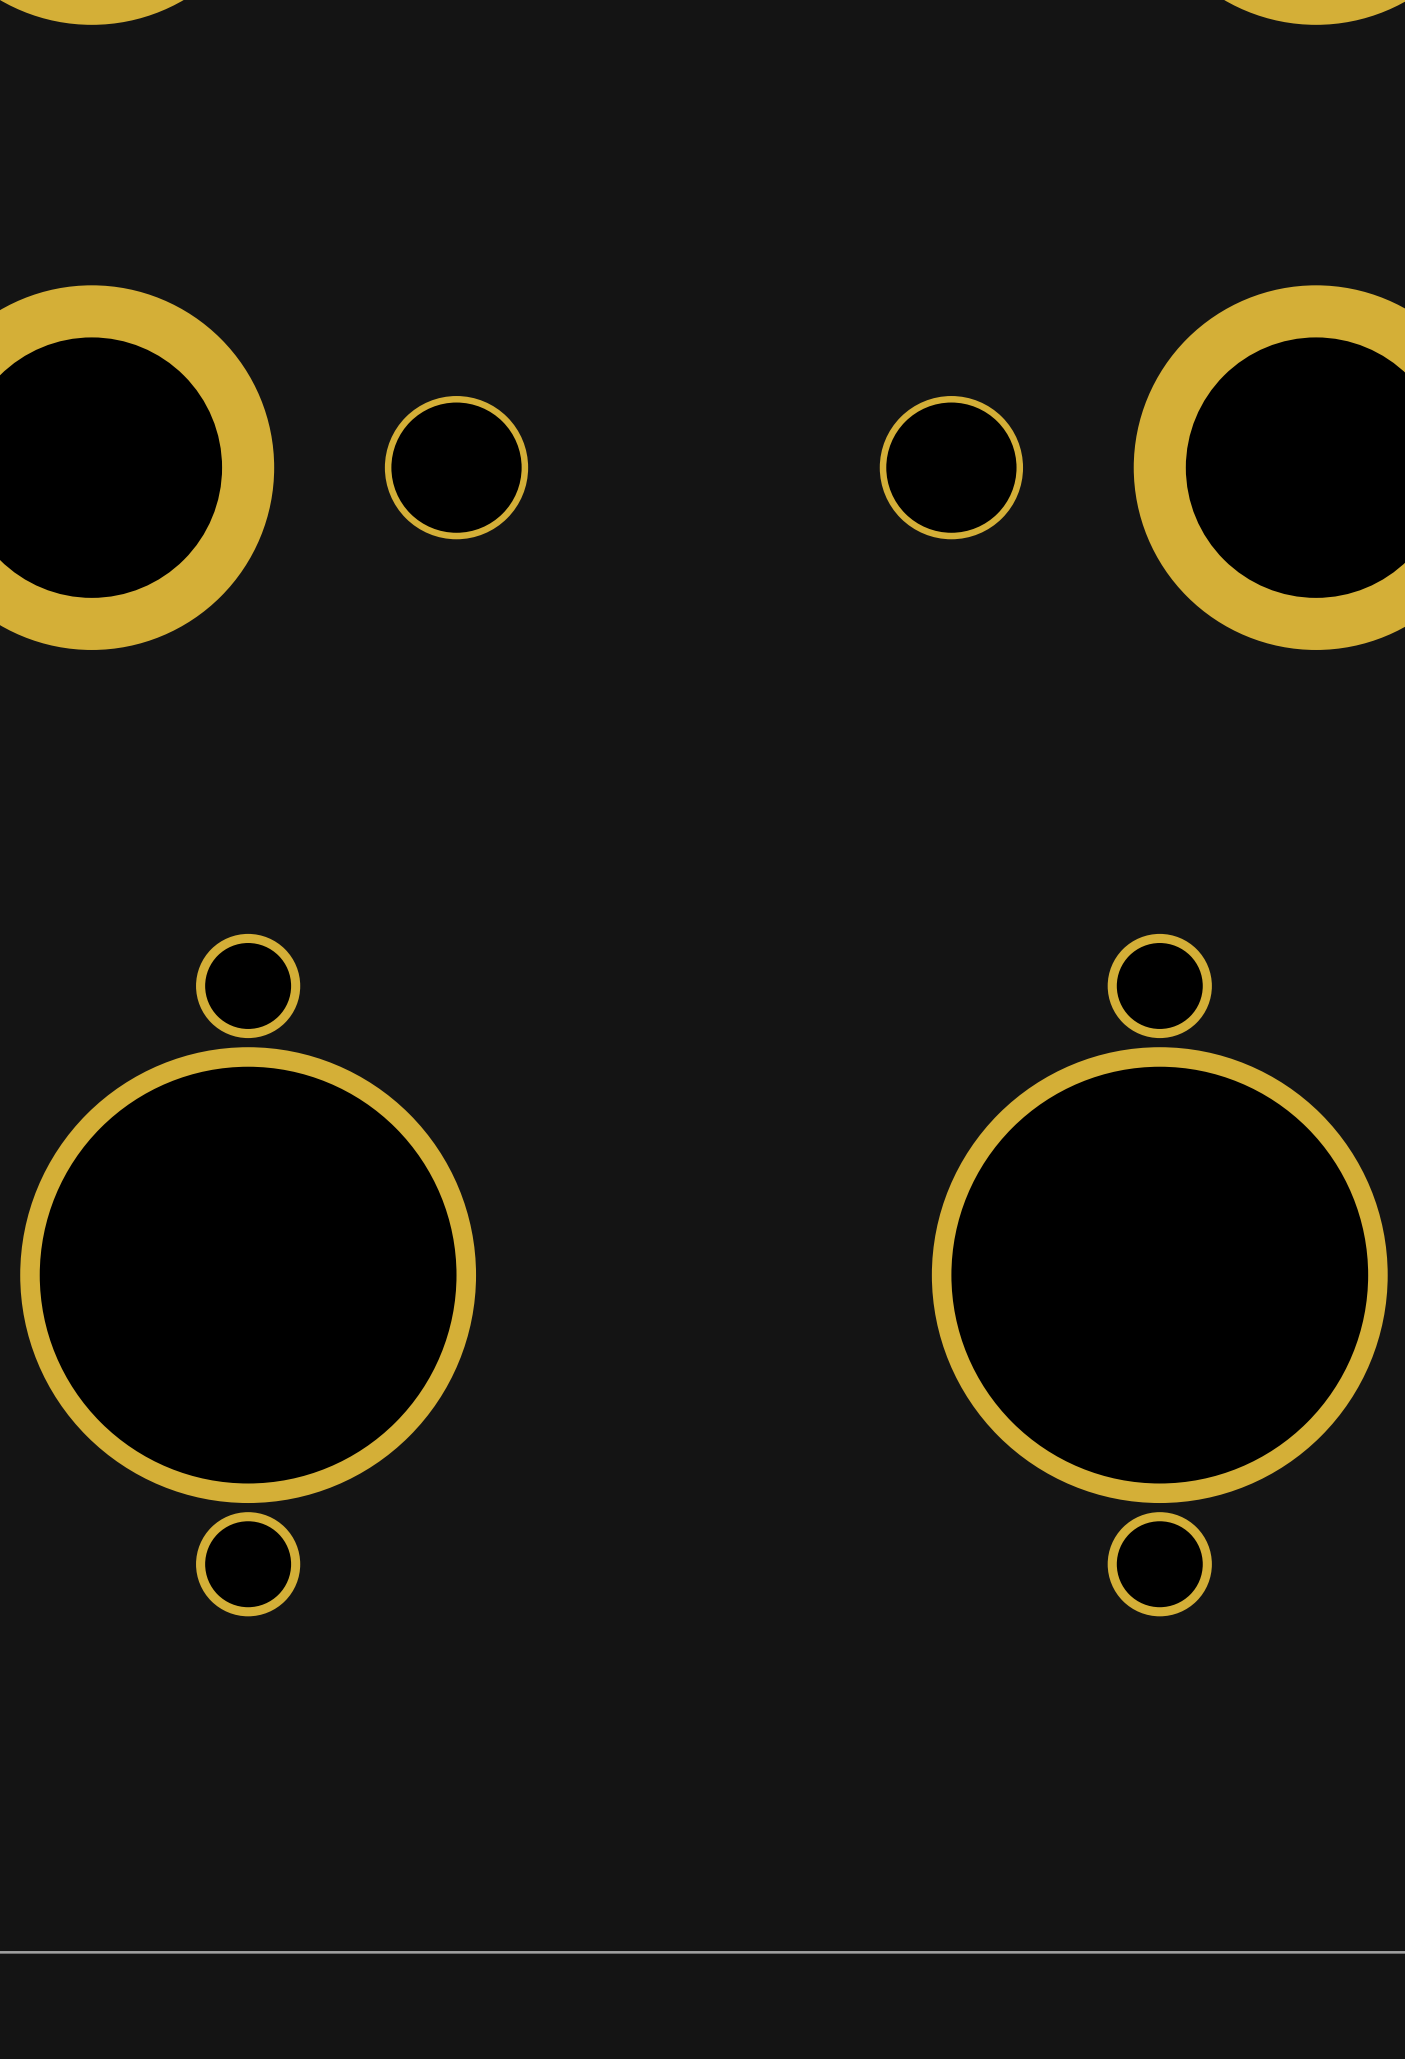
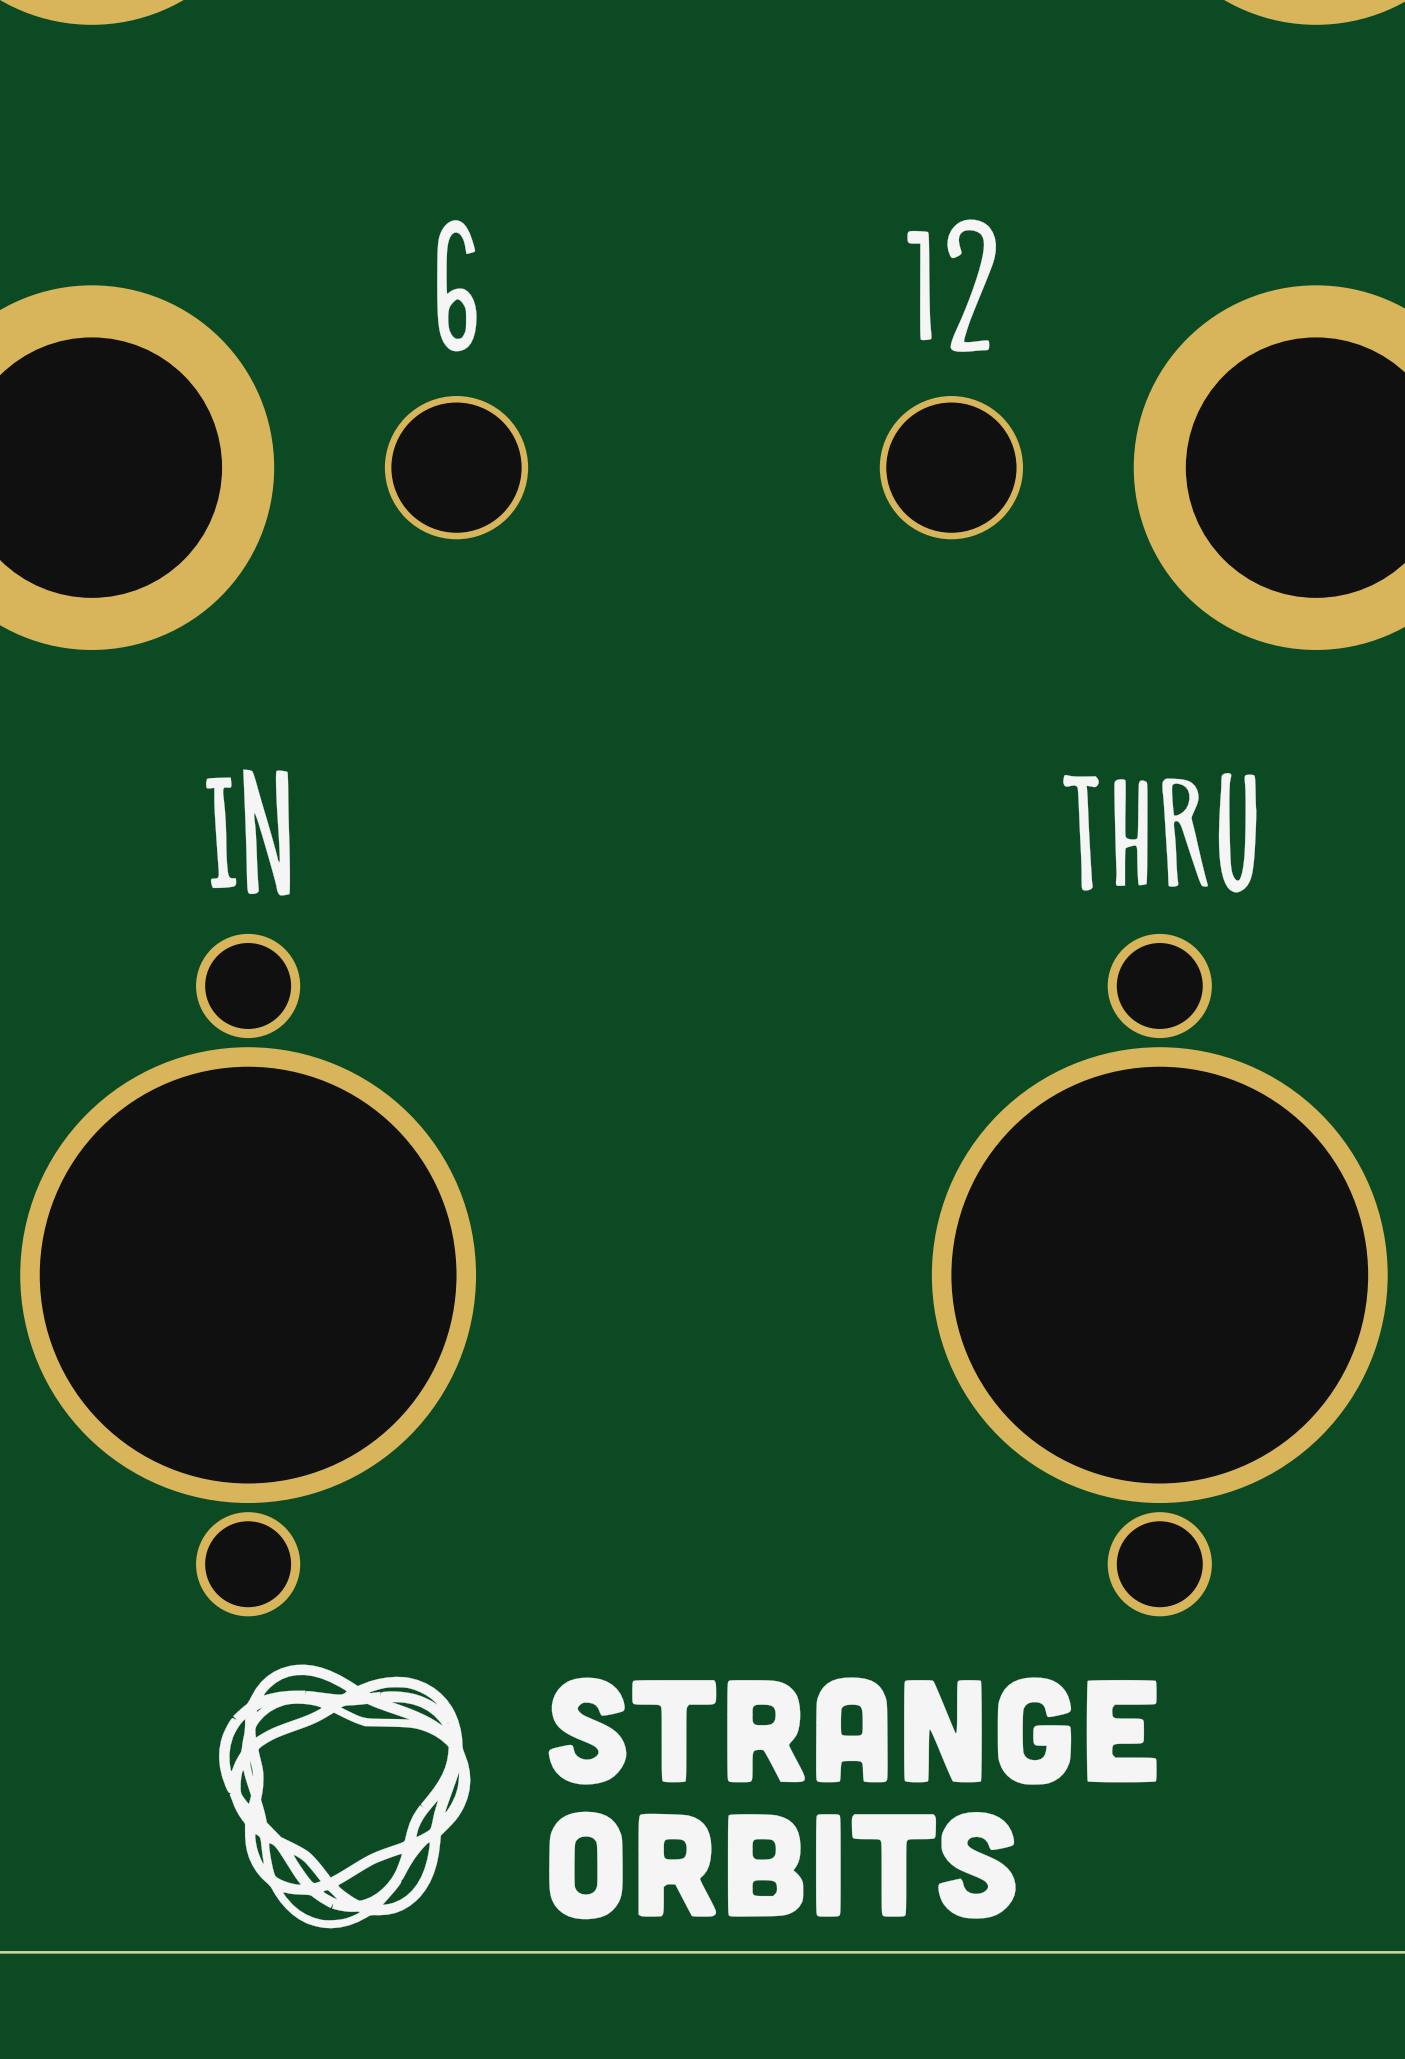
drawing: none -> [907, 219, 997, 352]
drawing: none -> [437, 220, 477, 352]
drawing: none -> [206, 769, 291, 896]
drawing: none -> [1063, 773, 1257, 893]
drawing: none -> [219, 1664, 1157, 1929]

